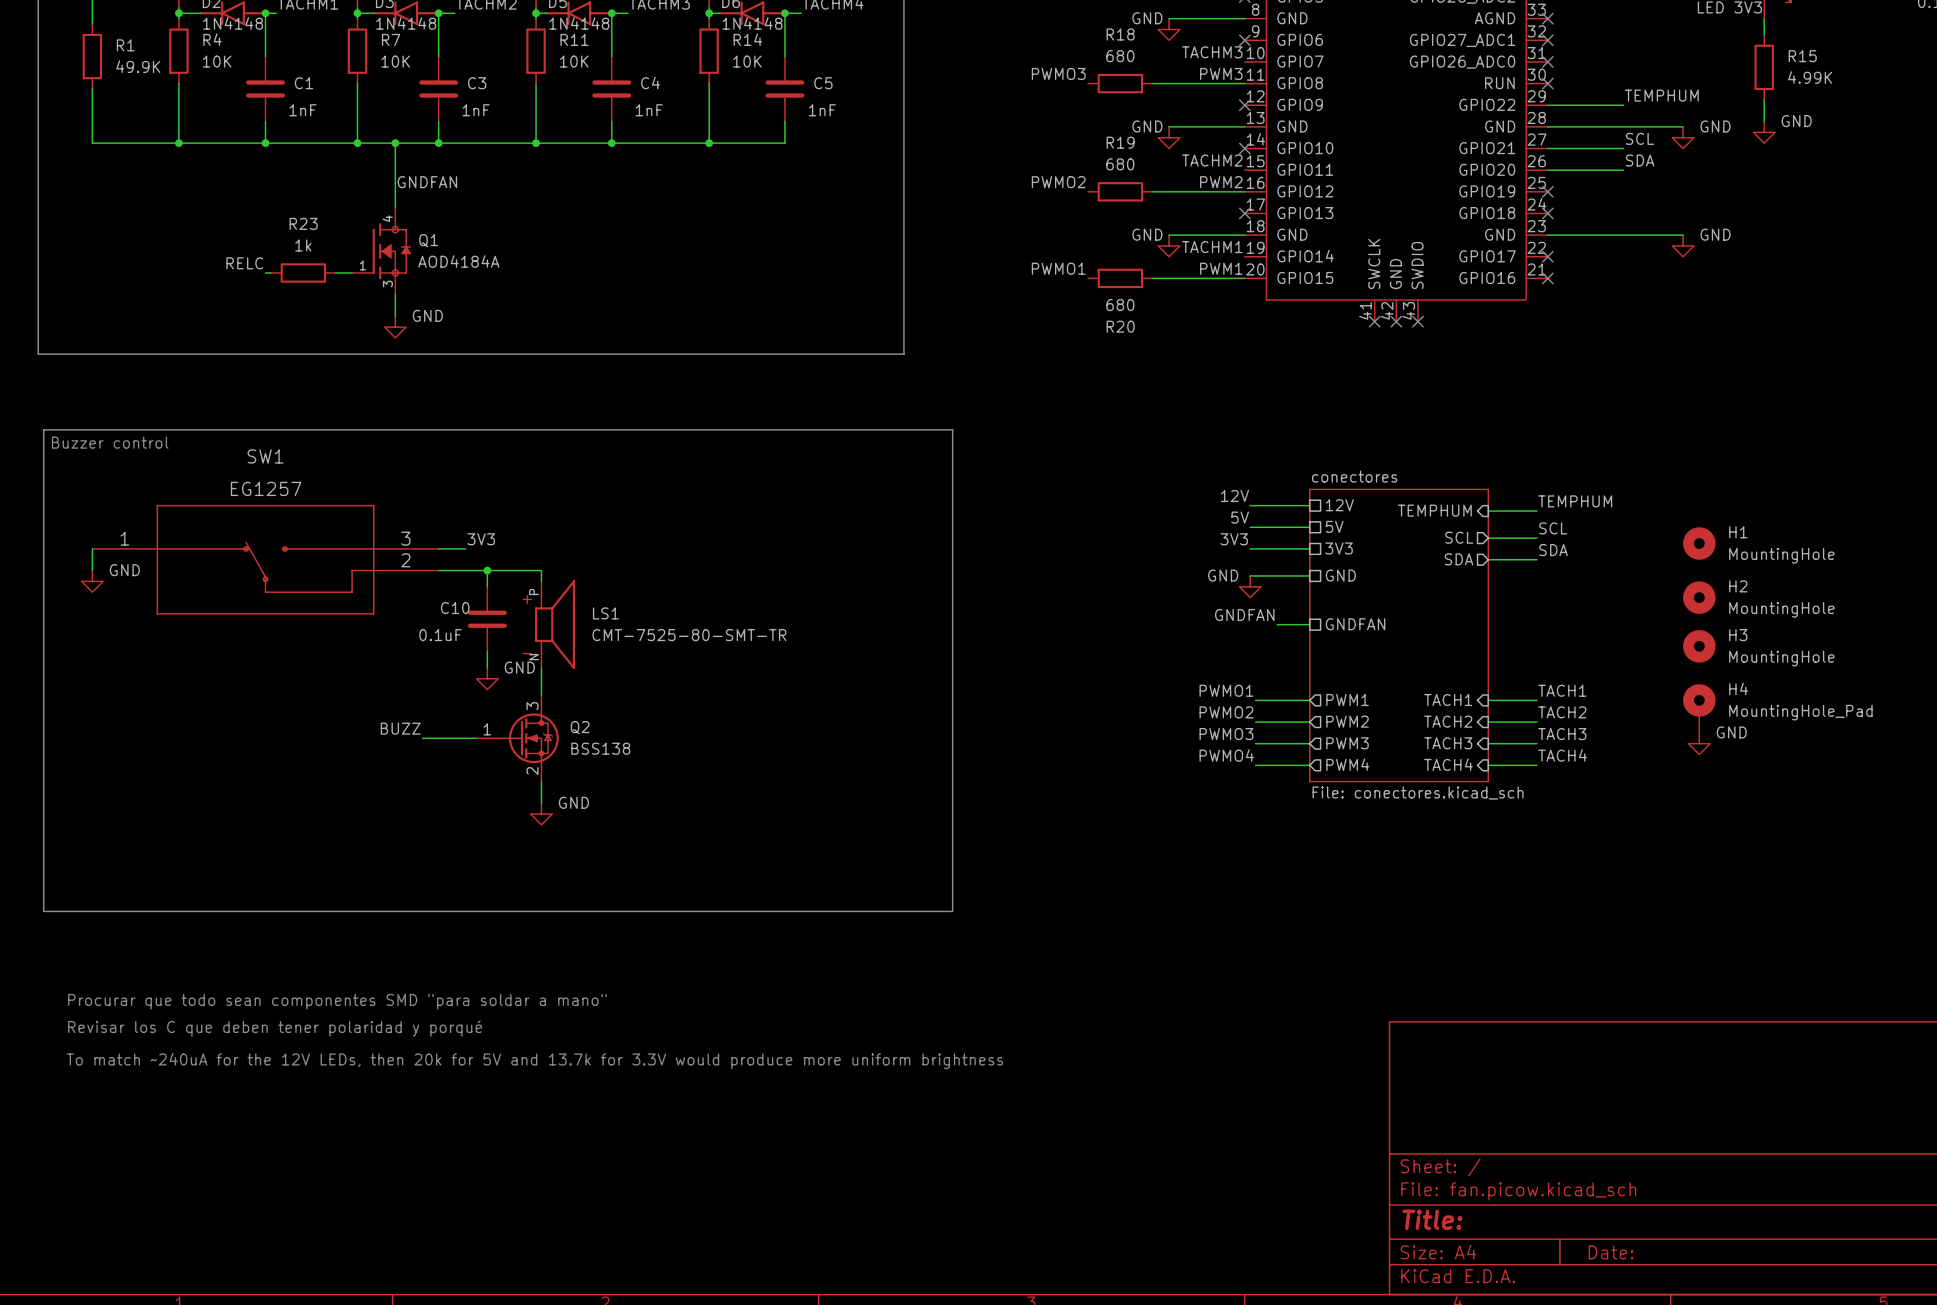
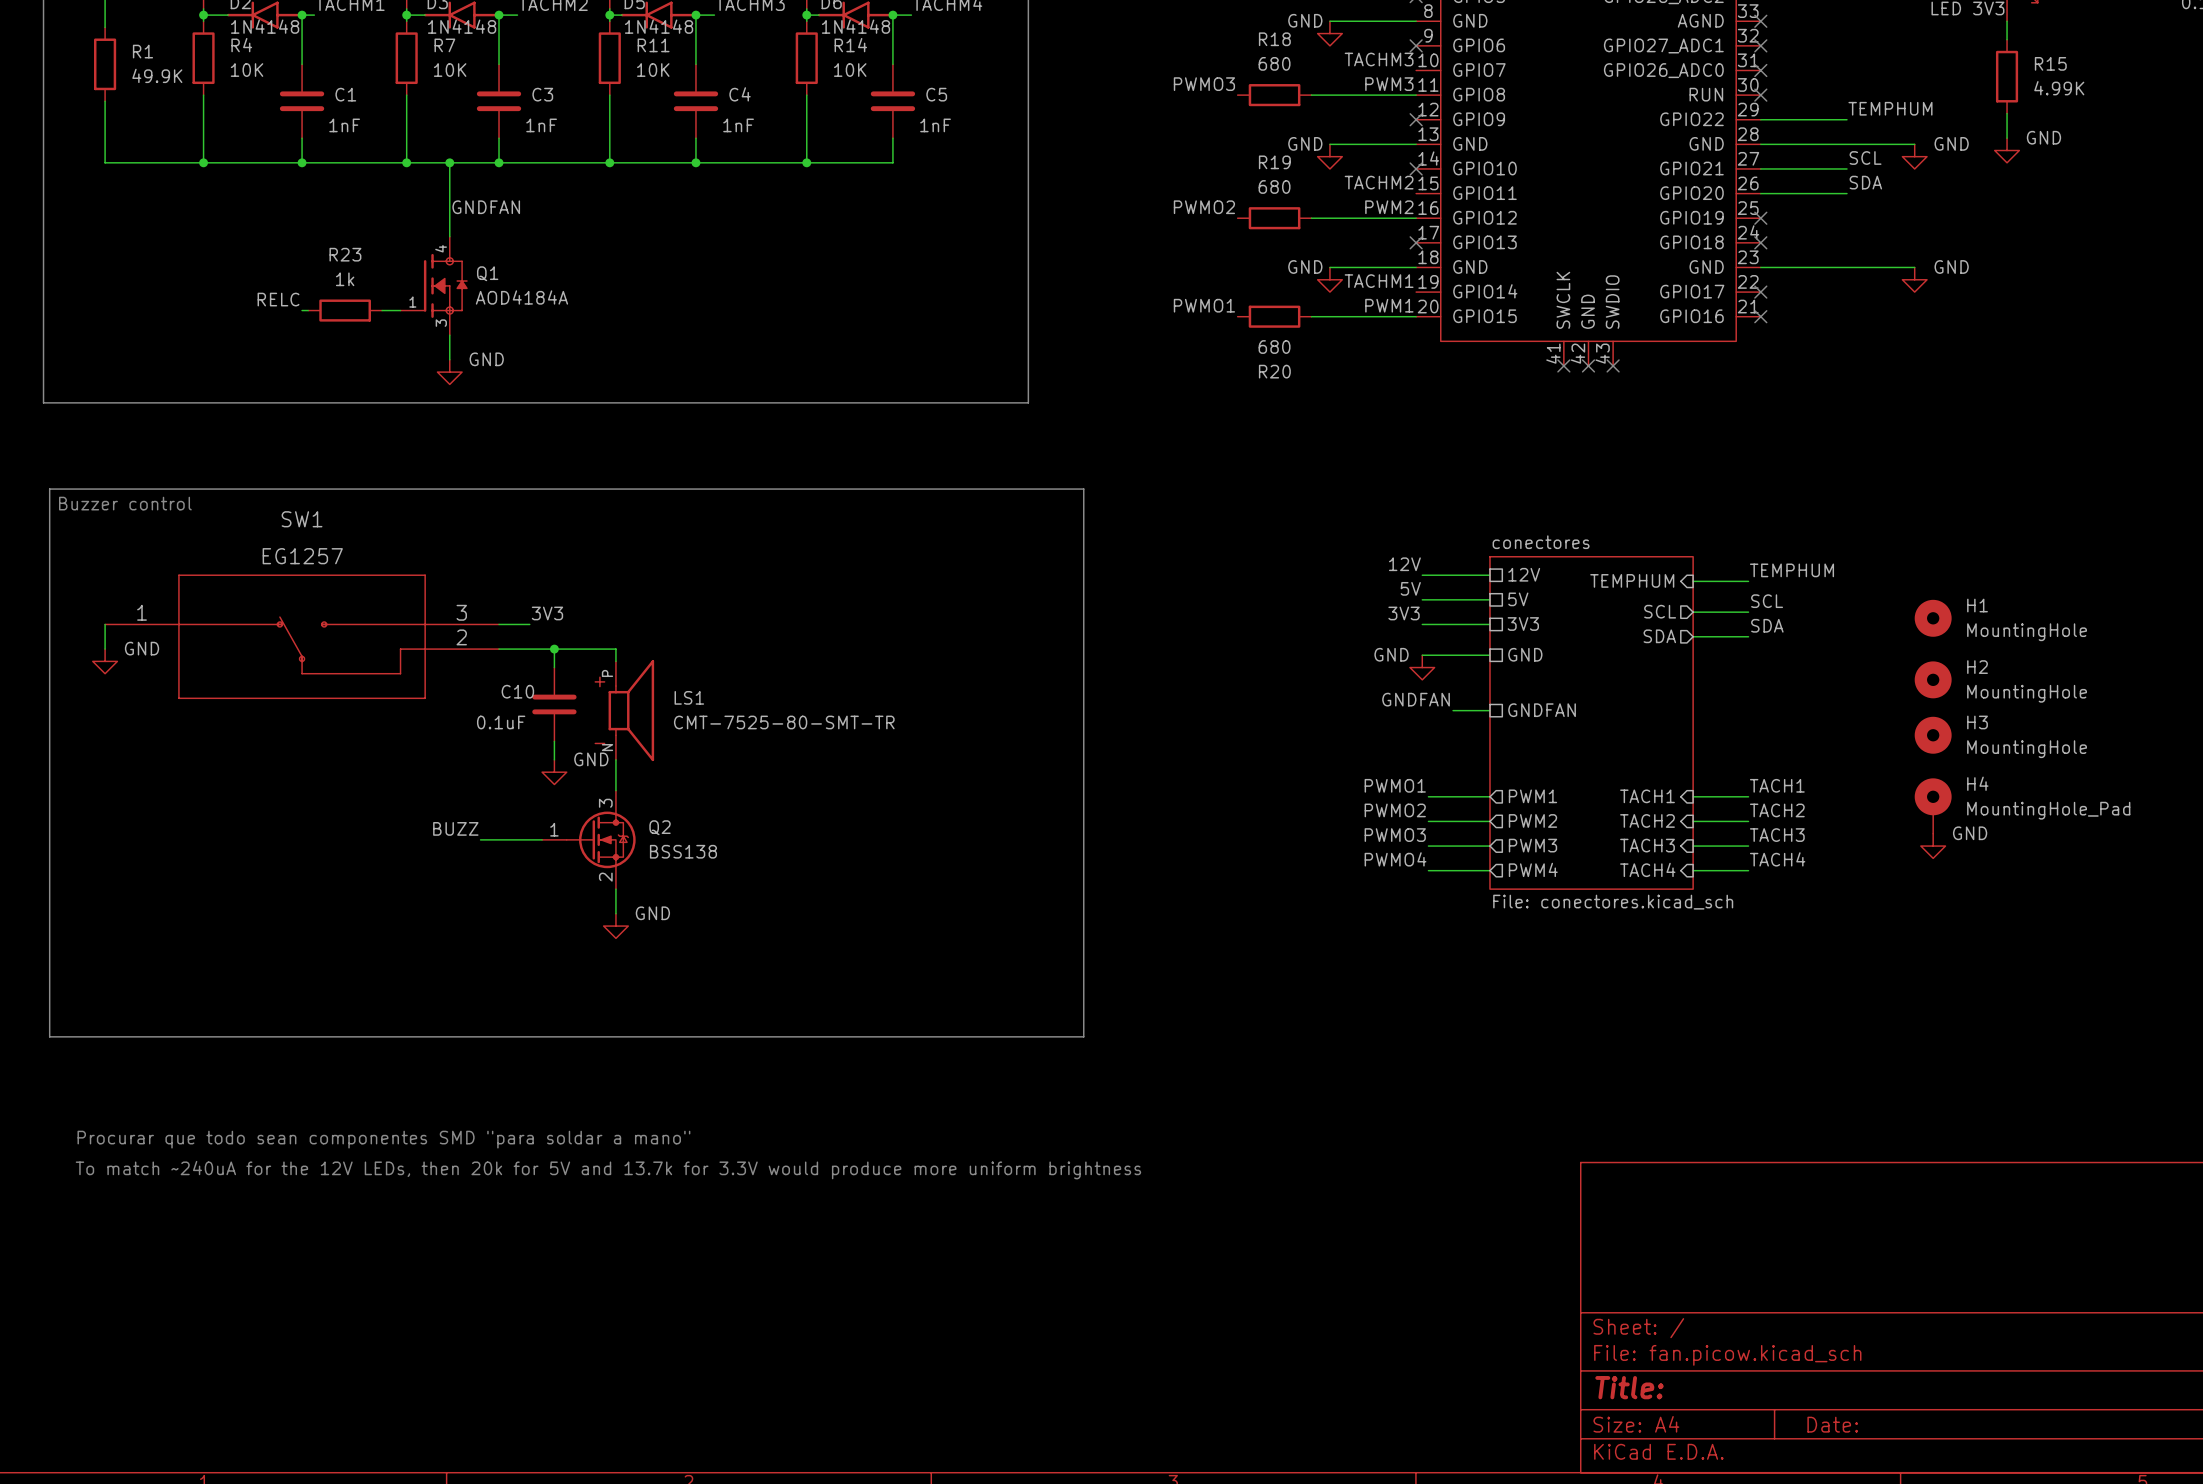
text: Revisar los C que deben tener polaridad y porqué (275, 1028) -> To match ~240uA for the 12V LEDs, then 20k for 5V and 13.7k for 3.3V would produce more uniform brightness (608, 1170)
text: To match ~240uA for the 12V LEDs, then 20k for 5V and 13.7k for 3.3V would produce more uniform brightness (534, 1061) -> none

